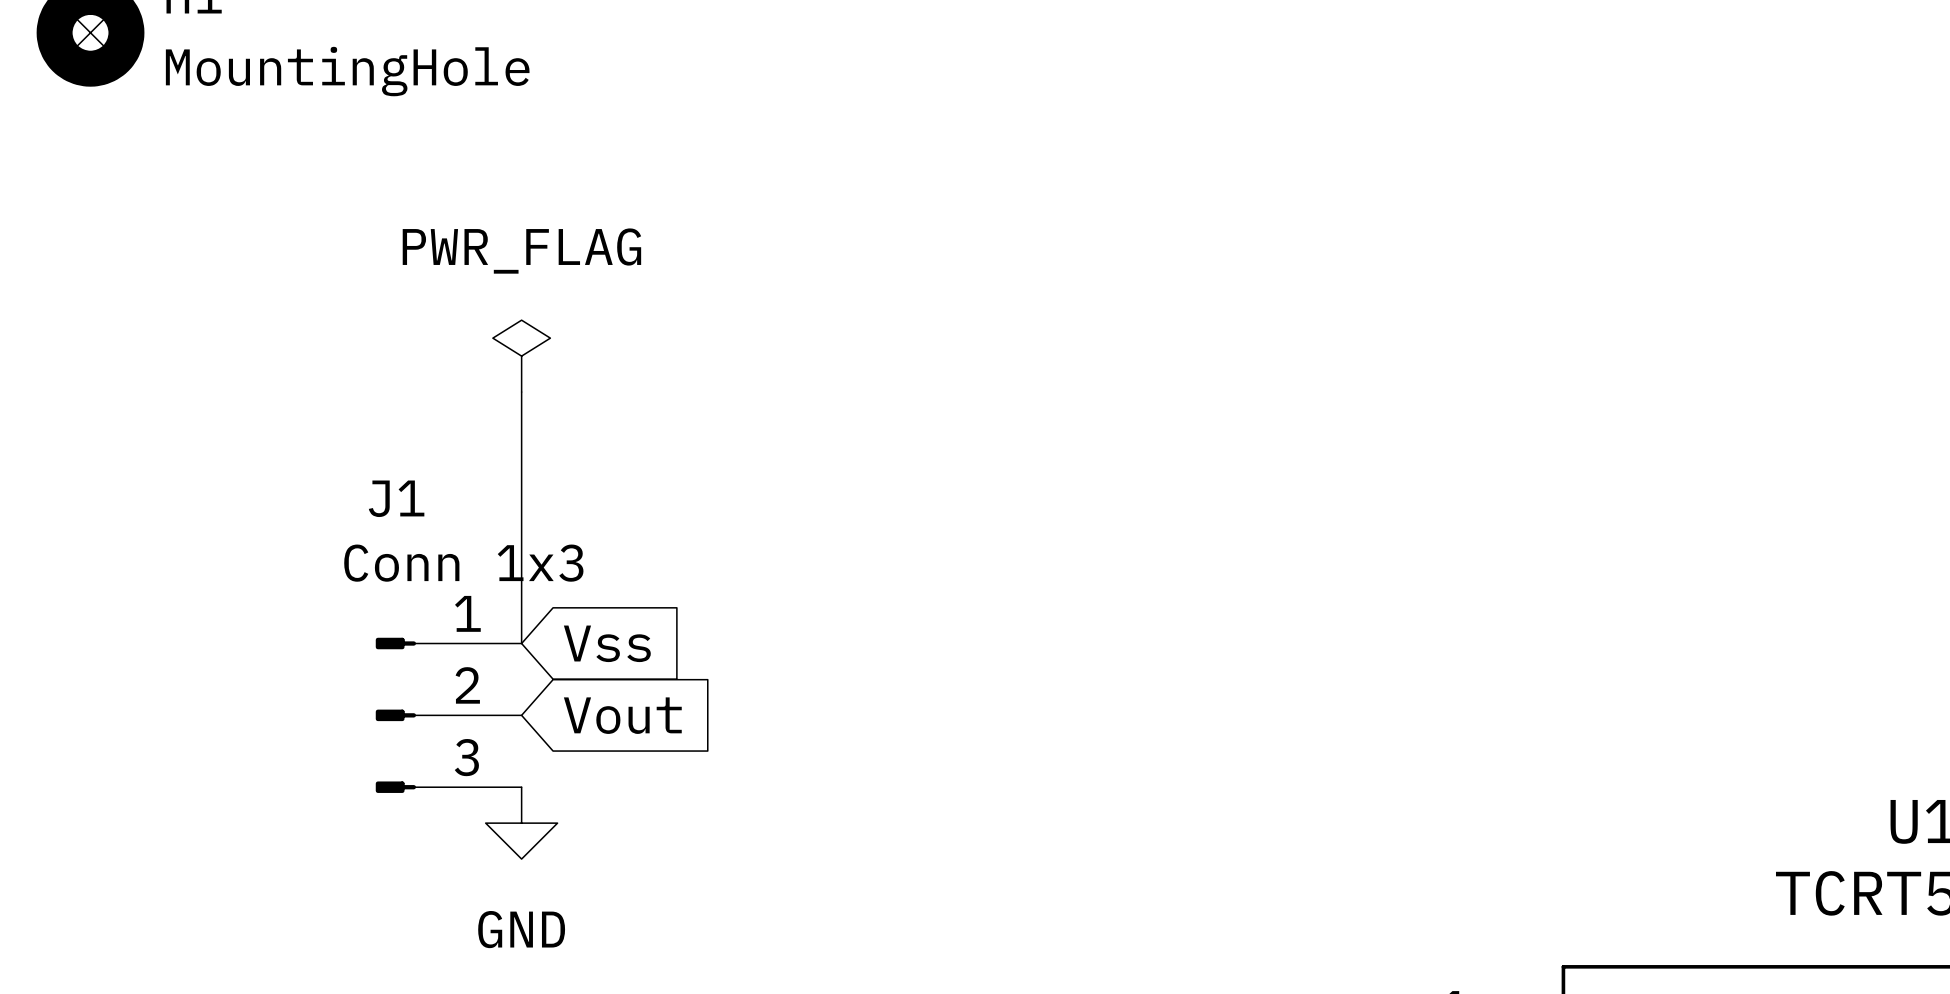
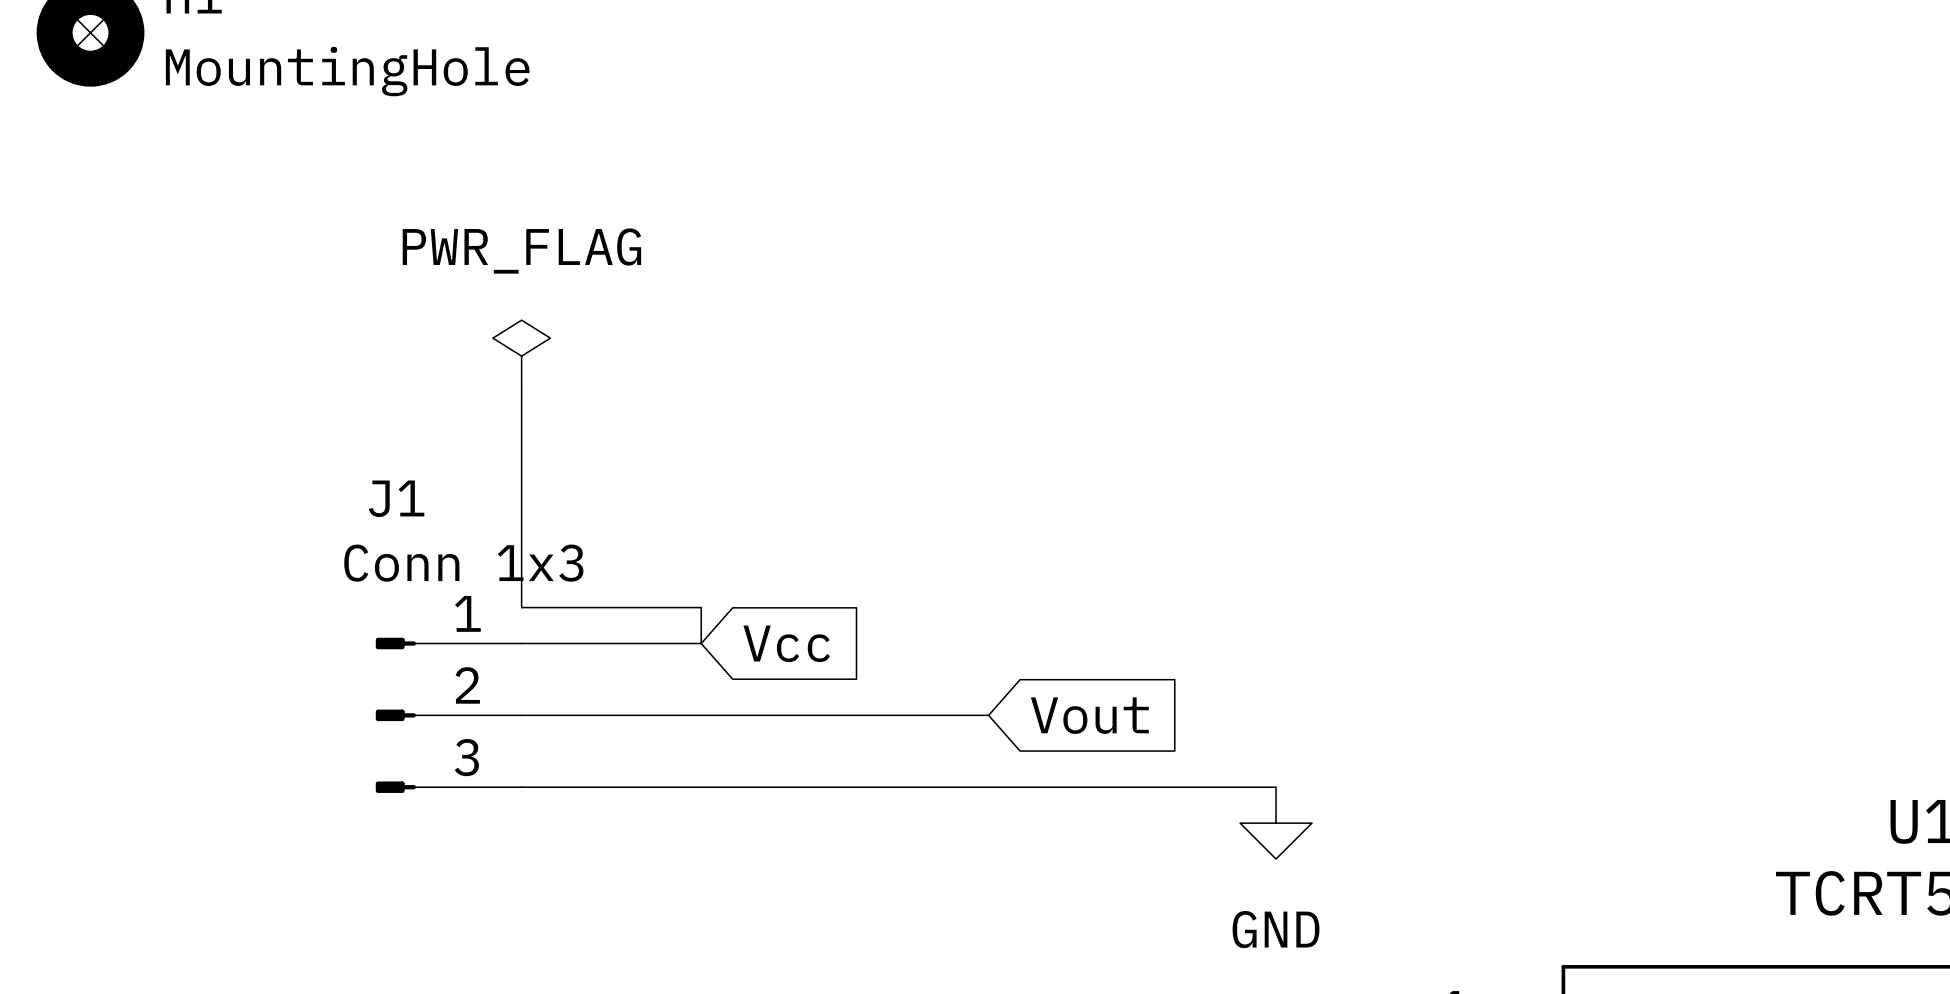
wire: (521, 607) (521, 643) -> (521, 607) (701, 607) (701, 643) (521, 643)
global label: Vss (607, 643) -> none
global label: none -> Vcc (786, 643)
wire: none -> (521, 715) (988, 715)
global label position: Vout (622, 715) -> Vout (1089, 715)
wire: none -> (521, 787) (1276, 787)
power symbol: GND (521, 823) -> none
power symbol: none -> GND (1276, 823)

